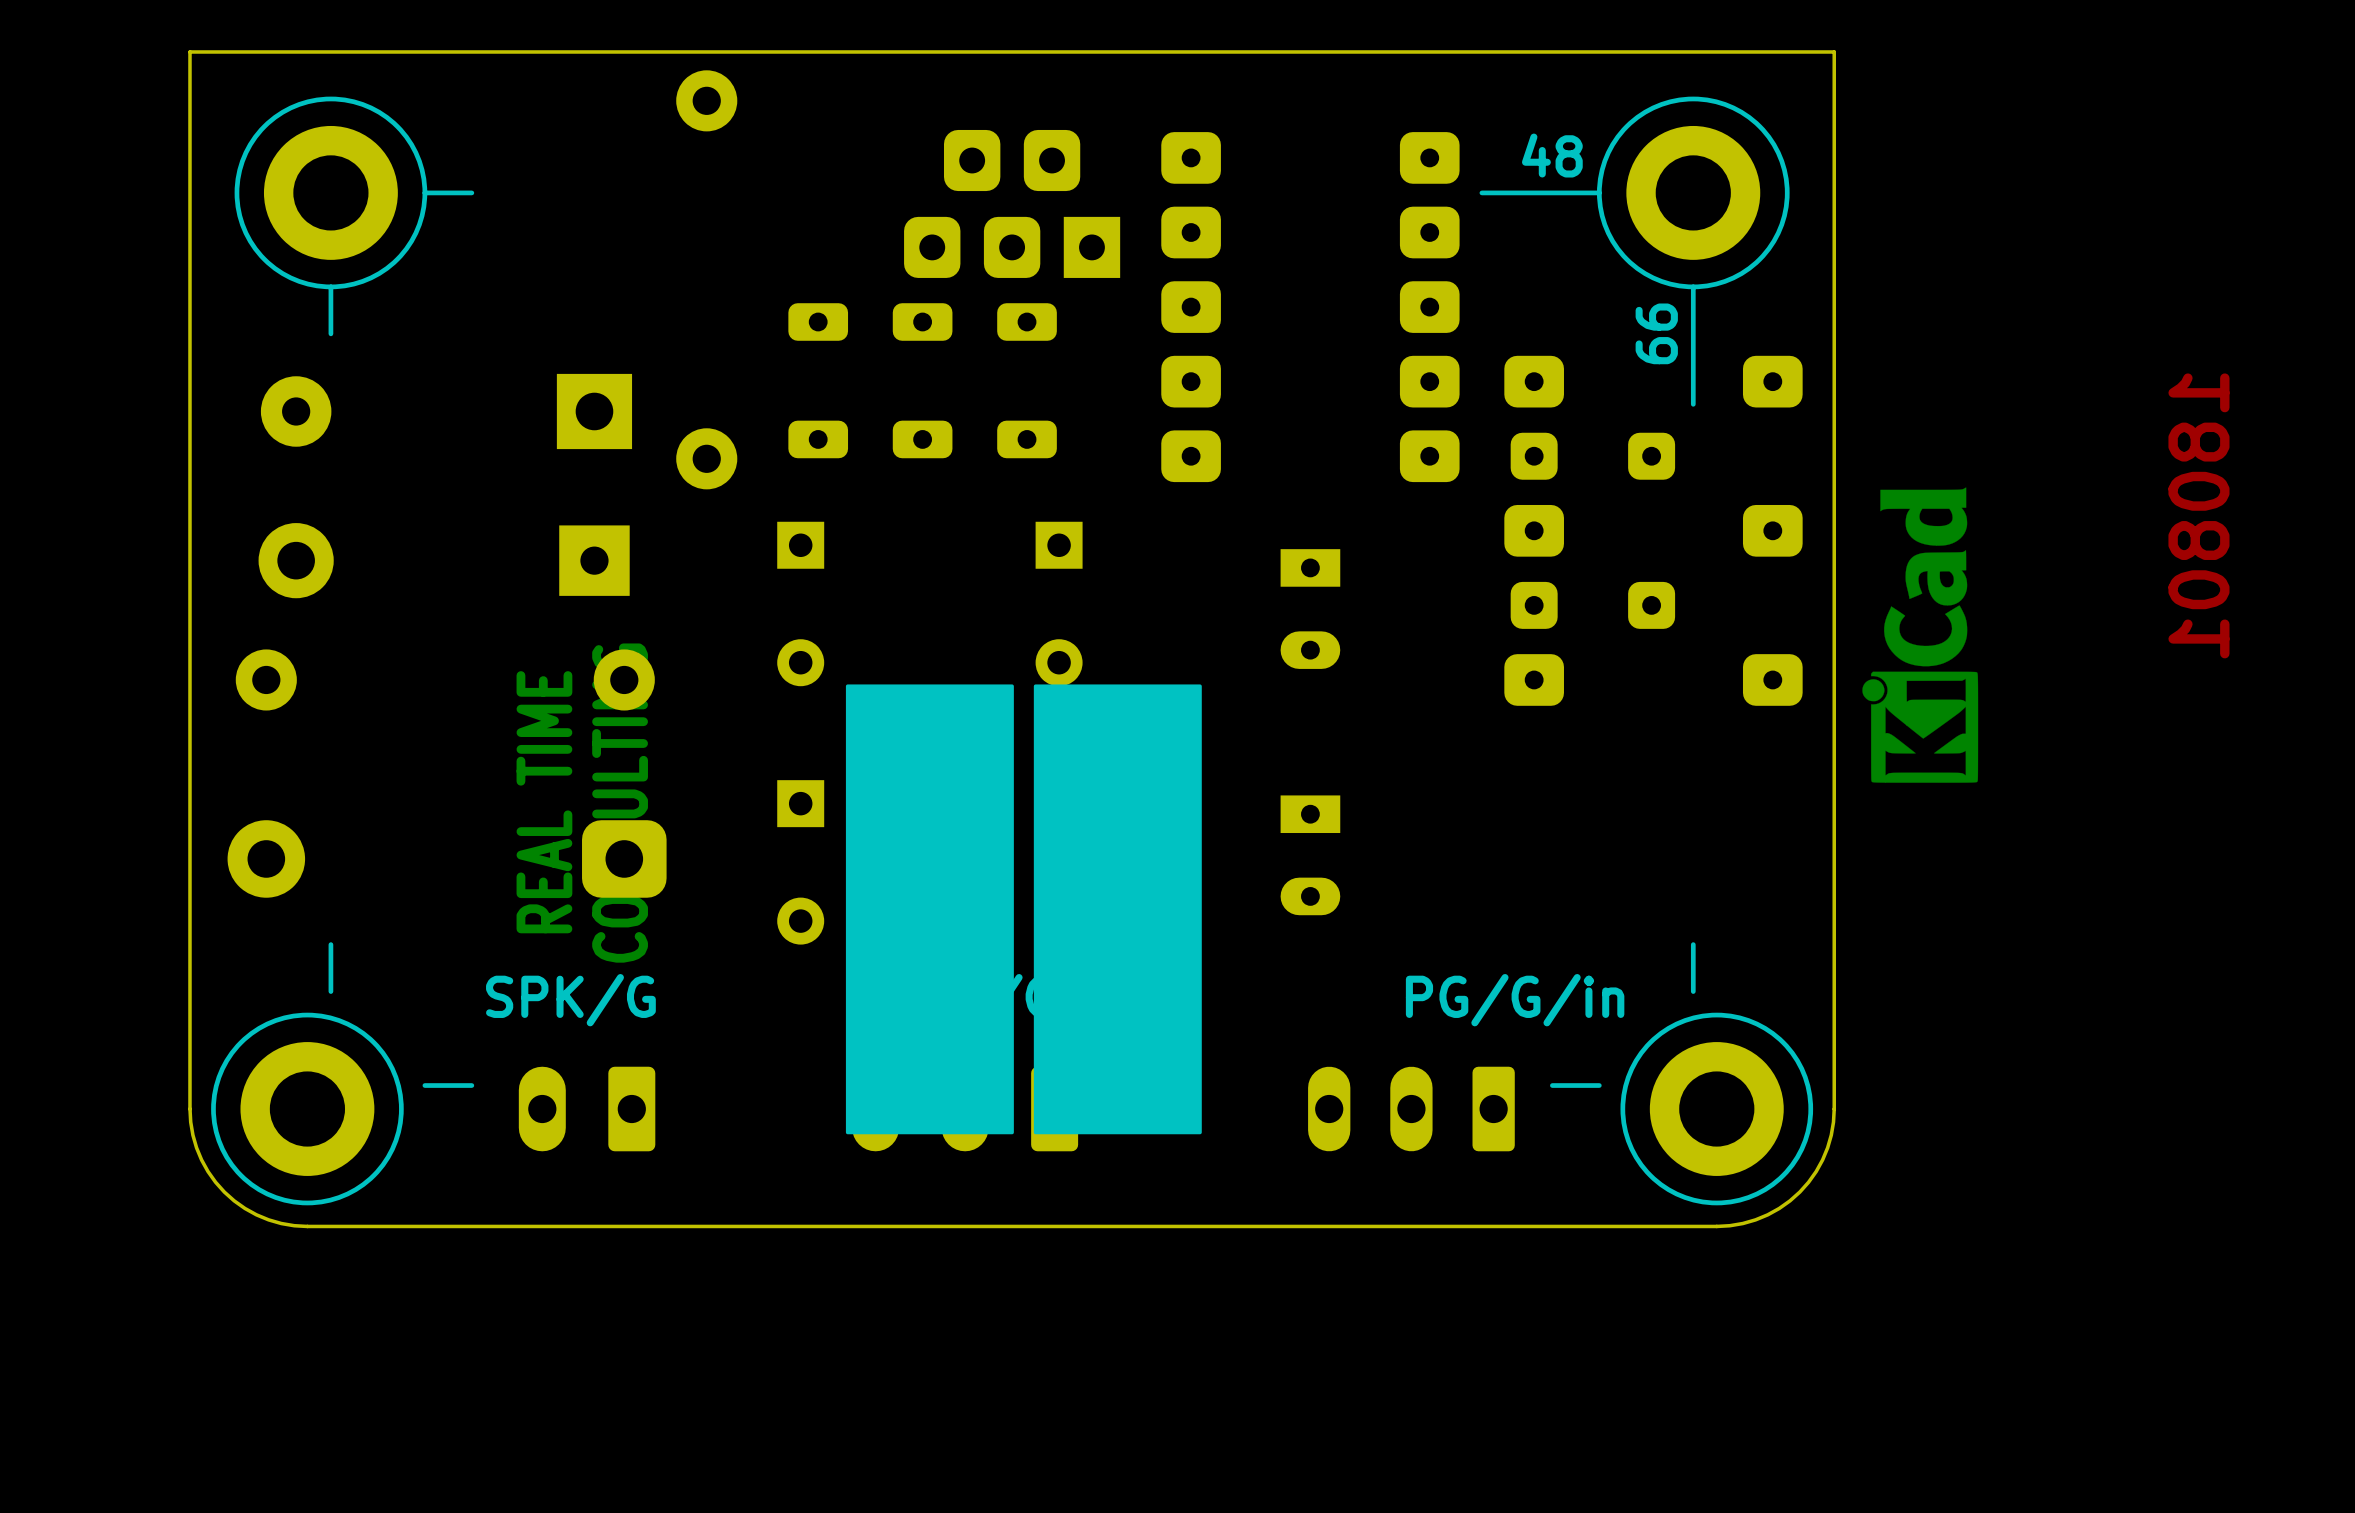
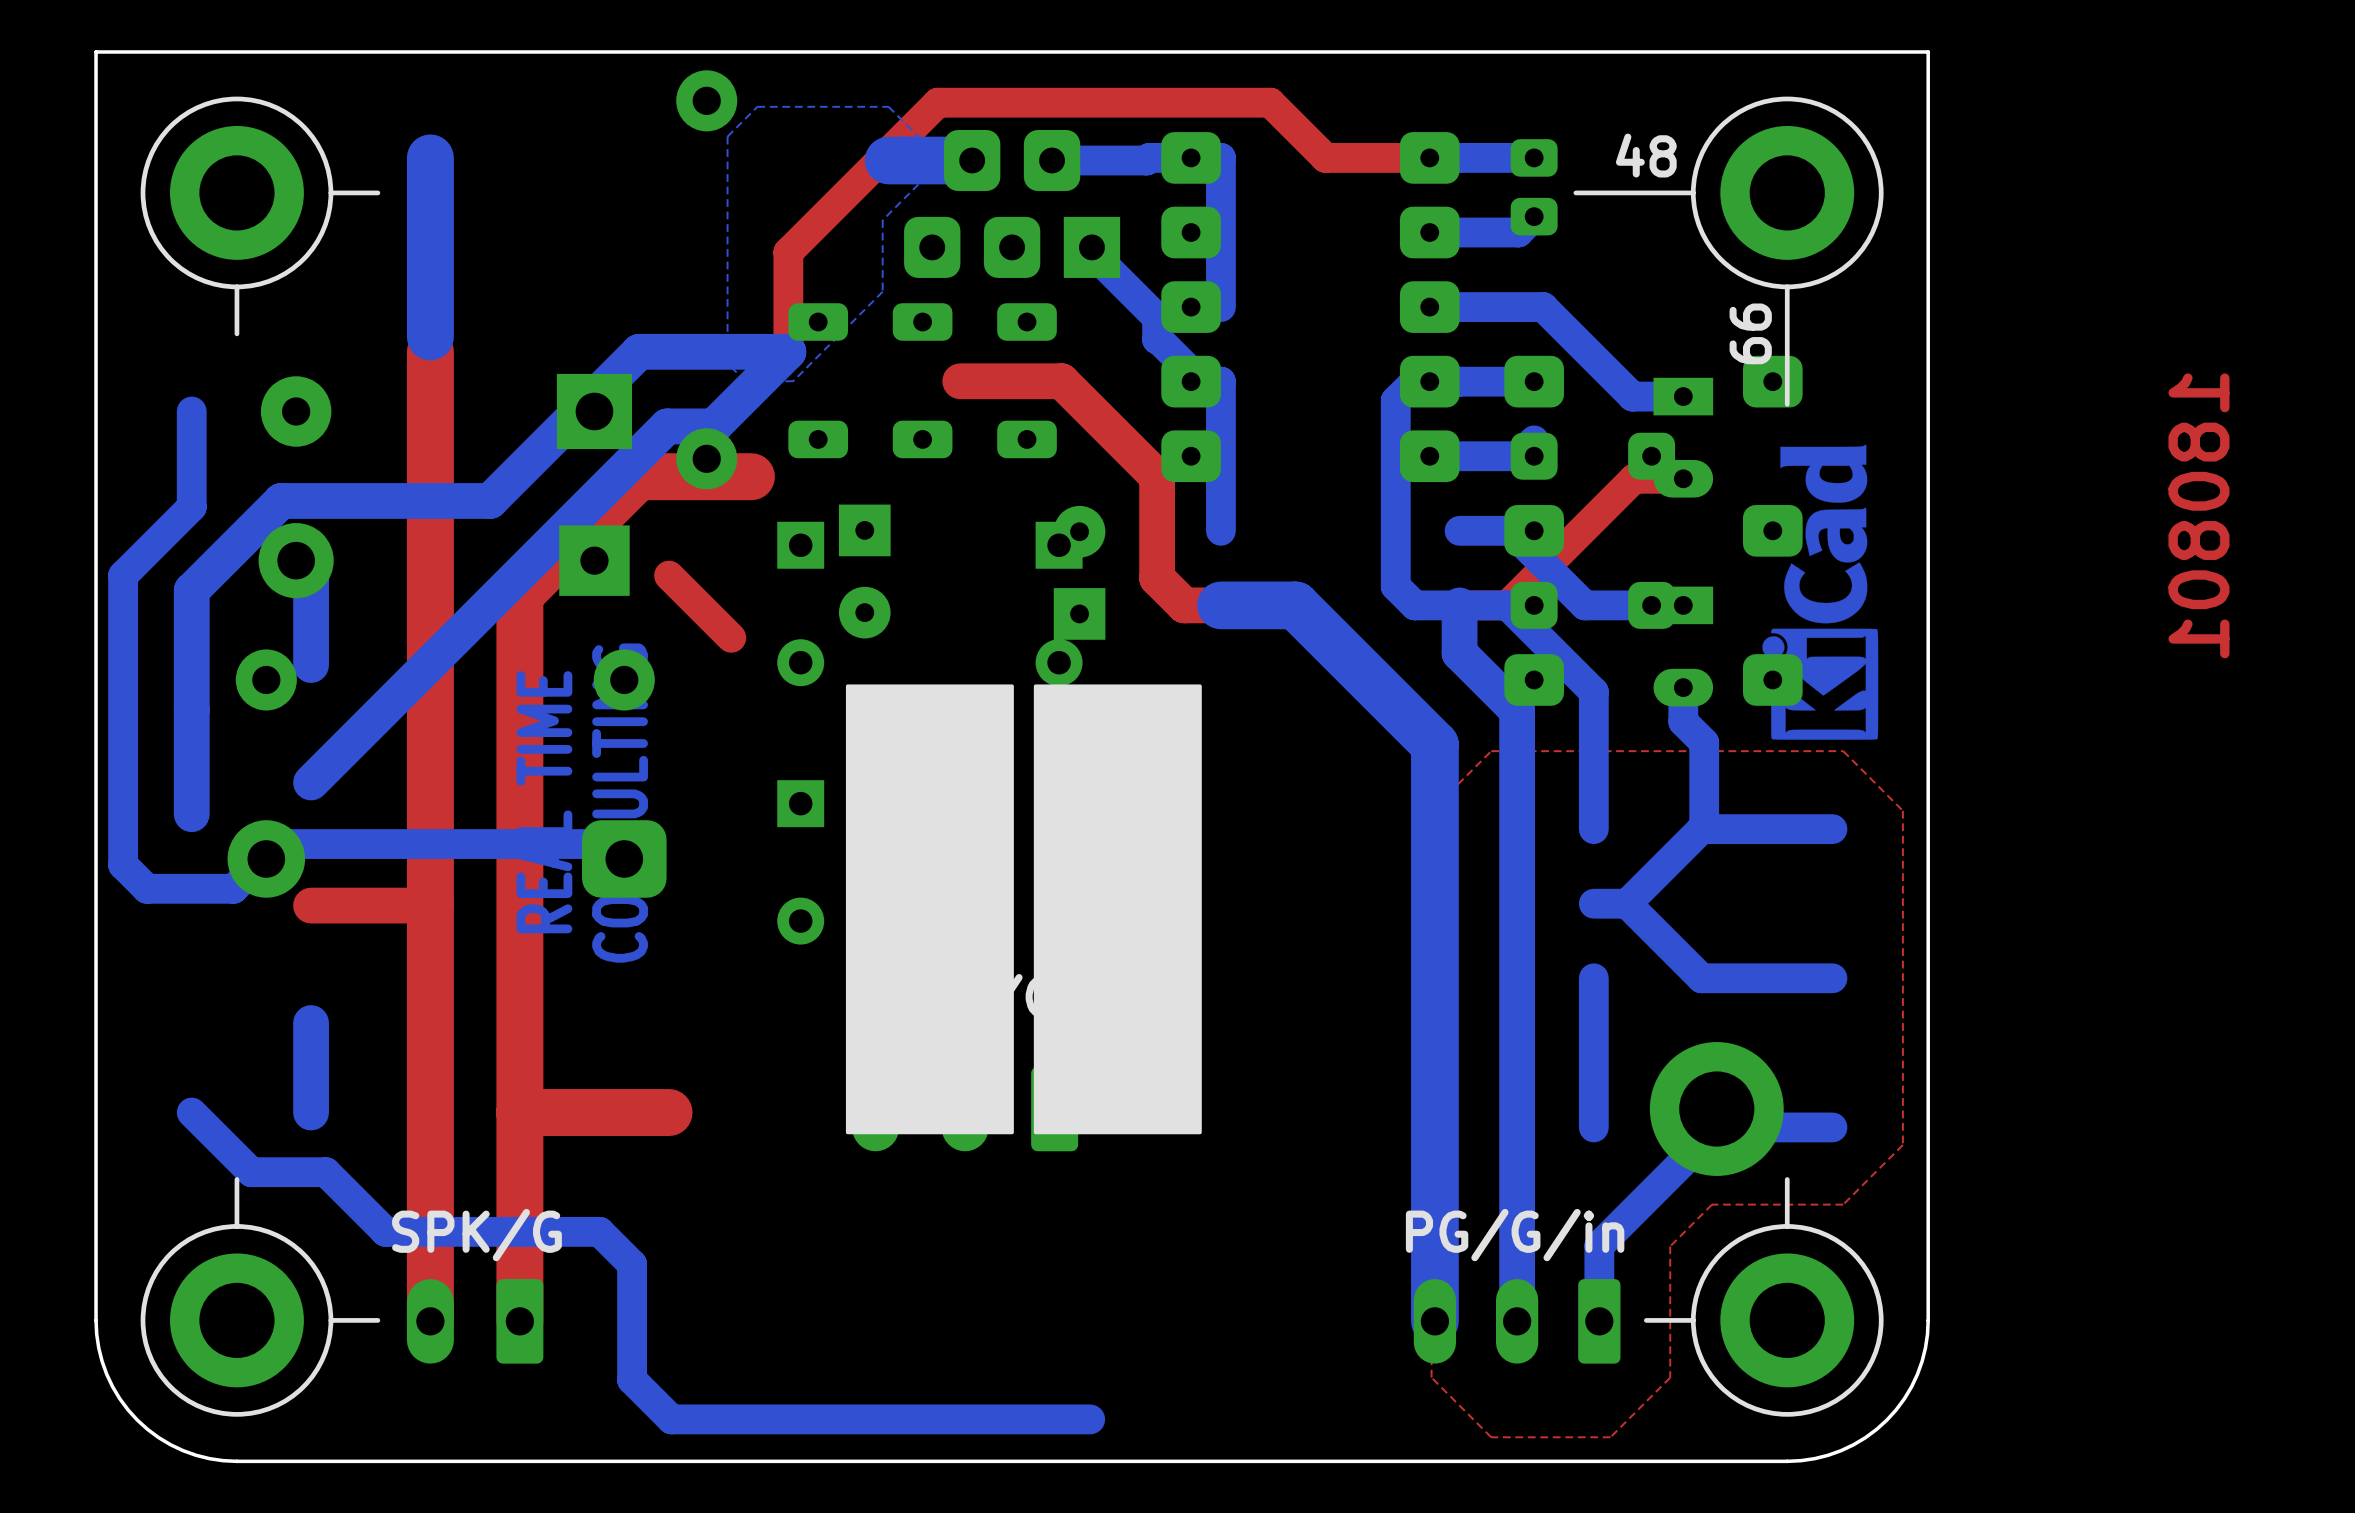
board edge: (1834, 51) (1833, 1122) (1822, 1159) (1799, 1192) (1779, 1208) (1755, 1219) (1716, 1226) (307, 1226) (268, 1219) (234, 1200) (215, 1182) (201, 1159) (192, 1135) (189, 1109) (189, 51) -> (1834, 51) (1928, 51) (1928, 1320) (1925, 1347) (1917, 1374) (1904, 1398) (1886, 1420) (1865, 1437) (1841, 1450) (1814, 1458) (1787, 1461) (236, 1461) (196, 1455) (170, 1444) (147, 1429) (128, 1409) (106, 1374) (98, 1347) (96, 1320) (96, 51) (189, 51)
bottom zone outline: none -> (888, 106) (757, 106) (727, 136) (727, 363) (745, 381) (793, 381) (882, 291) (882, 220) (918, 184) (918, 136) (888, 106)
text position: 48 (1552, 155) -> 48 (1646, 155)
bottom track: none -> (430, 157) (430, 336)
top track: none -> (1459, 157) (1325, 157) (1270, 102) (937, 102) (788, 252) (788, 351)
bottom track: none -> (1534, 157) (1459, 157)
bottom track: none -> (972, 160) (888, 160)
bottom track: none -> (1052, 160) (1220, 157) (1220, 307)
part: none -> (1534, 187)
part position: (330, 192) -> (236, 192)
drawing position: (330, 192) -> (236, 192)
line: (471, 192) (424, 192) -> (377, 192) (330, 192)
line: (1575, 192) (1481, 192) -> (1693, 192) (1599, 192)
part position: (1693, 192) -> (1787, 192)
drawing position: (1693, 192) -> (1787, 192)
bottom track: none -> (1534, 216) (1518, 232) (1459, 232)
bottom track: none -> (1091, 247) (1091, 252) (1157, 317) (1157, 339) (1200, 381) (1220, 381) (1220, 530)
line: (330, 286) (330, 333) -> (236, 286) (236, 333)
line: (1693, 286) (1693, 404) -> (1787, 286) (1787, 404)
bottom track: none -> (1459, 307) (1543, 307) (1632, 396) (1683, 396)
text position: 66 (1656, 333) -> 66 (1750, 333)
top track: none -> (430, 351) (430, 1321)
top track: none -> (960, 381) (1061, 381) (1157, 476) (1157, 578) (1184, 605) (1220, 605)
bottom track: none -> (1534, 381) (1414, 381) (1395, 400) (1395, 586) (1414, 605) (1507, 605) (1593, 691) (1593, 829)
bottom track: none -> (191, 411) (191, 506) (123, 575) (123, 864) (146, 888) (233, 888) (278, 844) (630, 844)
part: none -> (1683, 437)
bottom track: none -> (1534, 440) (1518, 456) (1459, 456)
top track: none -> (751, 476) (638, 476) (519, 594) (519, 1321)
top track: none -> (1683, 478) (1633, 478) (1507, 605) (1459, 605)
bottom track: none -> (1459, 530) (1510, 530) (1584, 605) (1683, 605)
part: none -> (864, 571)
part: none -> (1079, 572)
bottom track: none -> (311, 575) (311, 665)
top track: none -> (669, 575) (731, 637)
bottom track: none -> (1220, 605) (1295, 605) (1434, 744) (1434, 1321)
bottom track: none -> (1459, 605) (1459, 653) (1517, 710) (1517, 1321)
part: (1310, 609) -> none
drawing position: (1920, 635) -> (1820, 592)
part: none -> (1683, 646)
bottom track: none -> (1683, 687) (1683, 721) (1704, 742) (1704, 826) (1627, 903)
top zone outline: none -> (1843, 751) (1491, 751) (1431, 810) (1431, 1377) (1491, 1437) (1610, 1437) (1670, 1377) (1670, 1246) (1712, 1204) (1843, 1204) (1902, 1144) (1902, 810) (1843, 751)
bottom track: none -> (311, 782) (667, 426) (713, 426) (788, 351) (639, 351) (490, 500) (281, 500) (191, 590) (191, 814)
bottom track: none -> (1832, 829) (1701, 829)
part: (1310, 855) -> none
top track: none -> (430, 903) (428, 905) (311, 905)
bottom track: none -> (1627, 903) (1593, 903)
bottom track: none -> (1627, 903) (1701, 978) (1832, 978)
line: (330, 944) (330, 991) -> (236, 1179) (236, 1226)
line: (1693, 944) (1693, 991) -> (1787, 1179) (1787, 1226)
bottom track: none -> (1593, 978) (1593, 1127)
text position: SPK/G (570, 1000) -> SPK/G (476, 1235)
text position: PG/G/in (1515, 1000) -> PG/G/in (1515, 1235)
bottom track: none -> (311, 1023) (311, 1112)
line: (471, 1085) (424, 1085) -> (377, 1320) (330, 1320)
line: (1599, 1085) (1552, 1085) -> (1693, 1320) (1646, 1320)
part position: (307, 1109) -> (236, 1320)
drawing position: (307, 1109) -> (236, 1320)
part position: (587, 1109) -> (475, 1321)
part position: (1411, 1109) -> (1517, 1321)
drawing position: (1716, 1109) -> (1787, 1320)
bottom track: none -> (191, 1112) (251, 1172) (325, 1172) (385, 1231) (599, 1231) (632, 1264) (632, 1379) (671, 1419) (1090, 1419)
top track: none -> (669, 1112) (519, 1112)
bottom track: none -> (1832, 1127) (1717, 1127) (1599, 1245) (1599, 1321)
part: none -> (1787, 1320)

